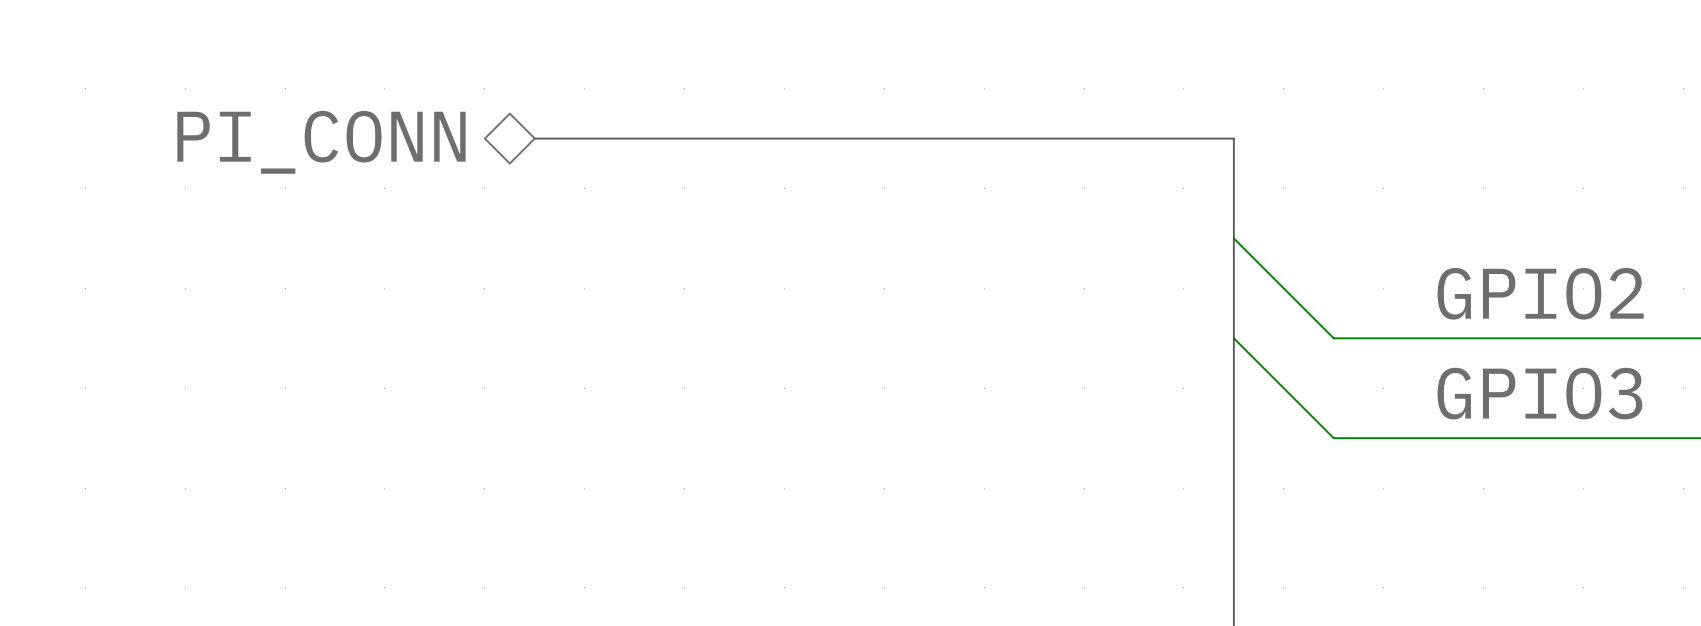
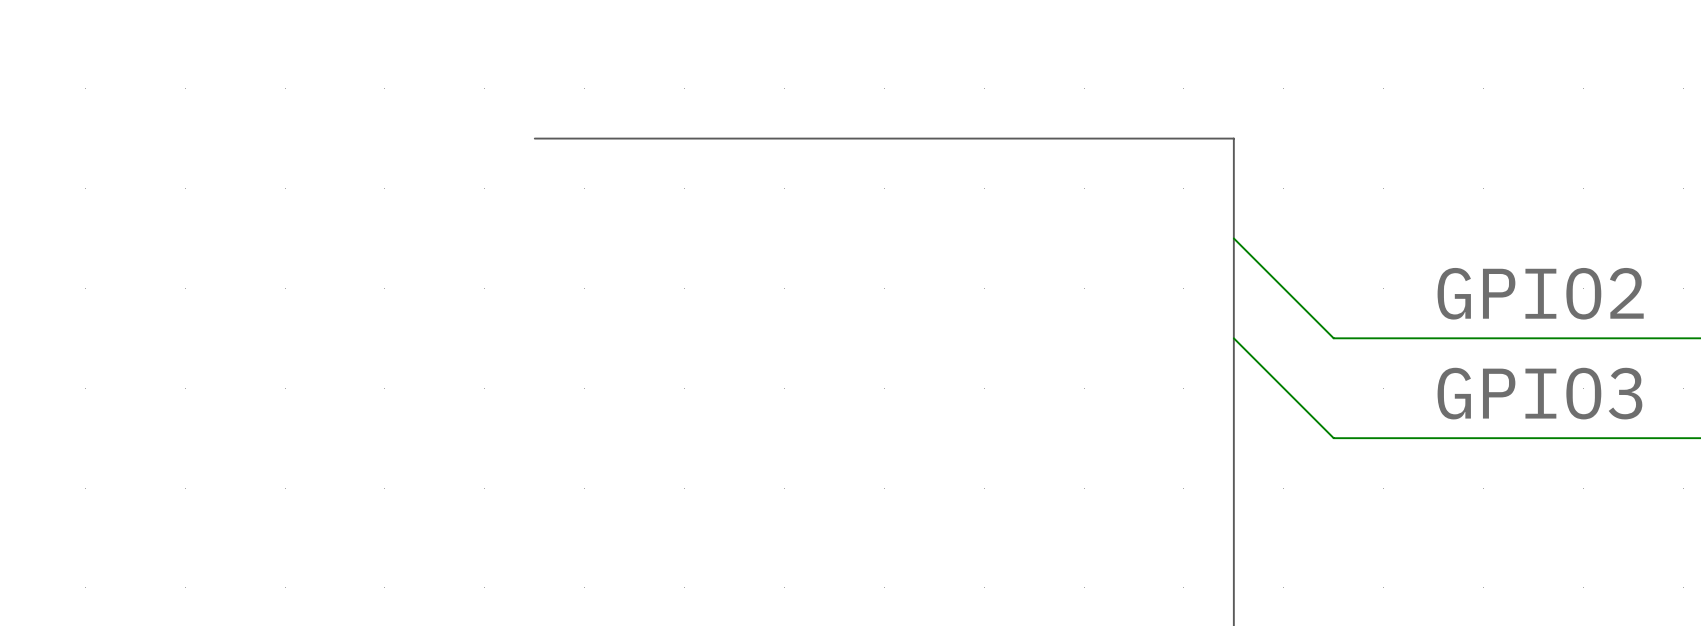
hierarchical label: PI_CONN (321, 142) -> none

